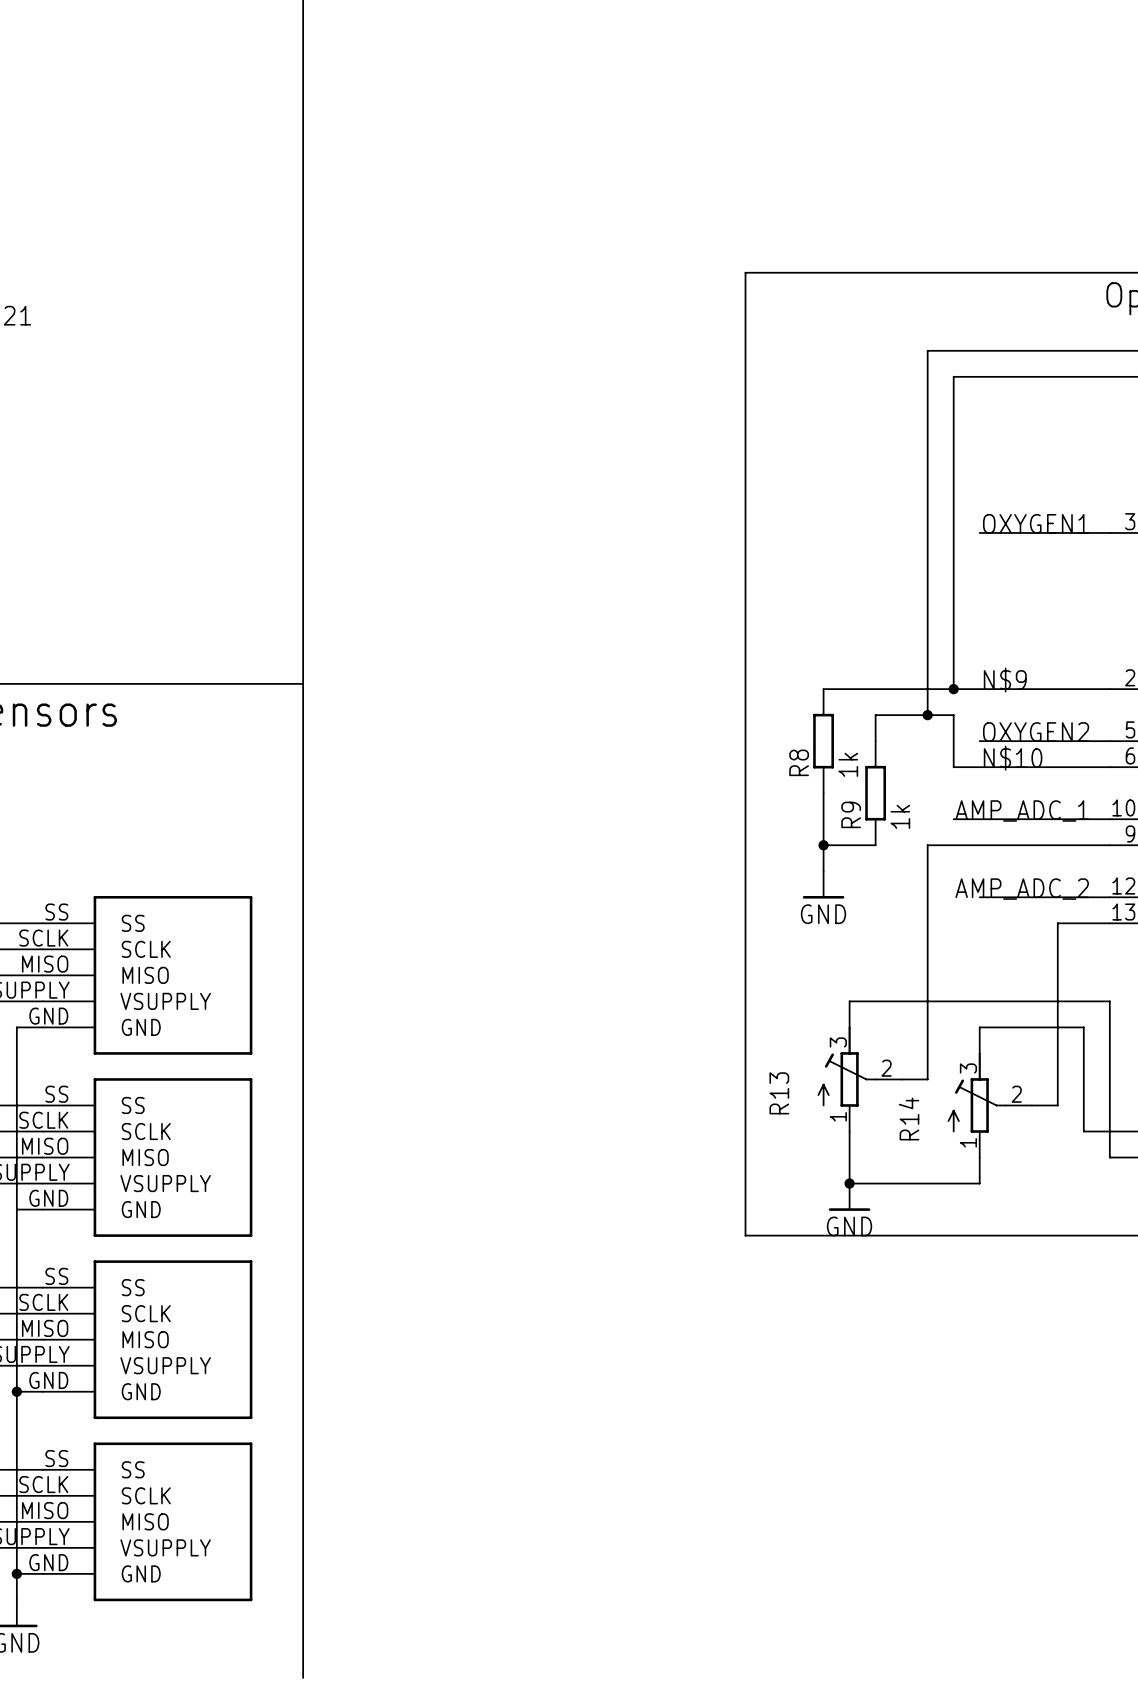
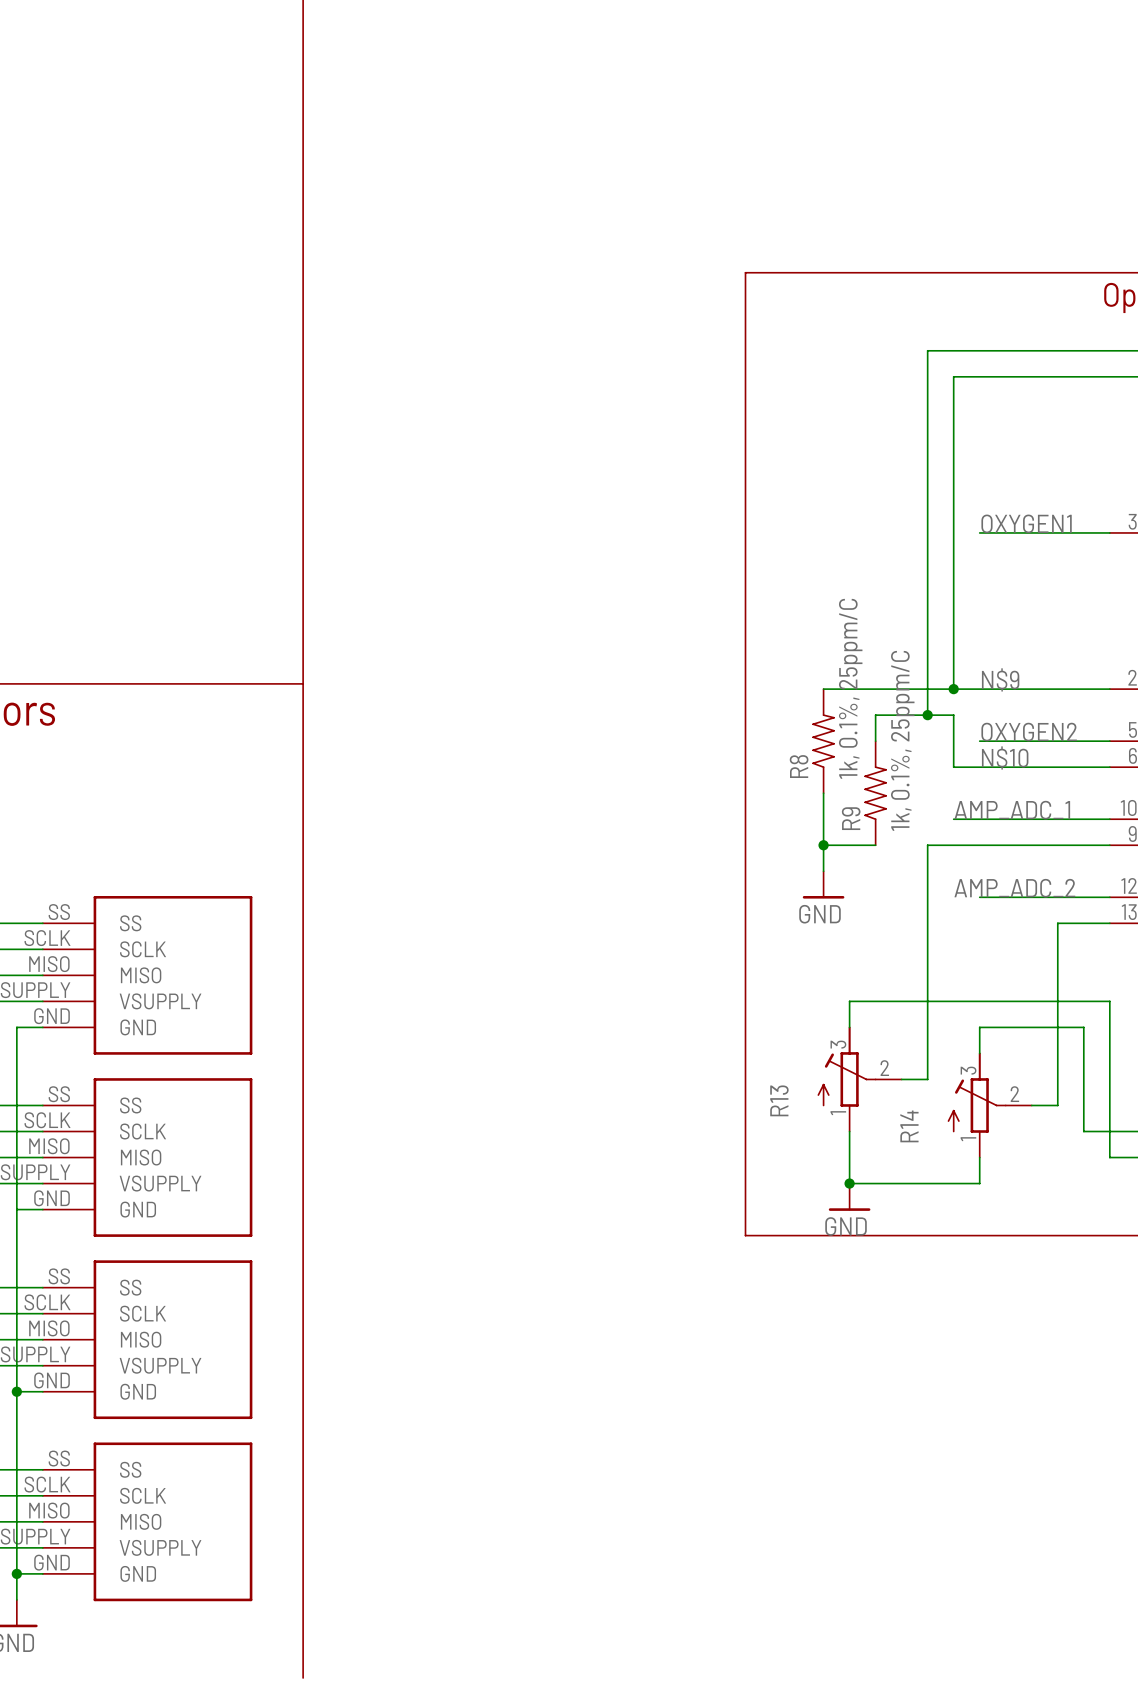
R8 symbol: [813, 689, 834, 794] -> [812, 689, 835, 794]
R9 symbol: [865, 741, 887, 846] -> [864, 741, 887, 846]
R8 value: 1k (848, 764) -> 1k, 0.1%, 25ppm/C (850, 688)
R9 value: 1k (900, 816) -> 1k, 0.1%, 25ppm/C (902, 740)

